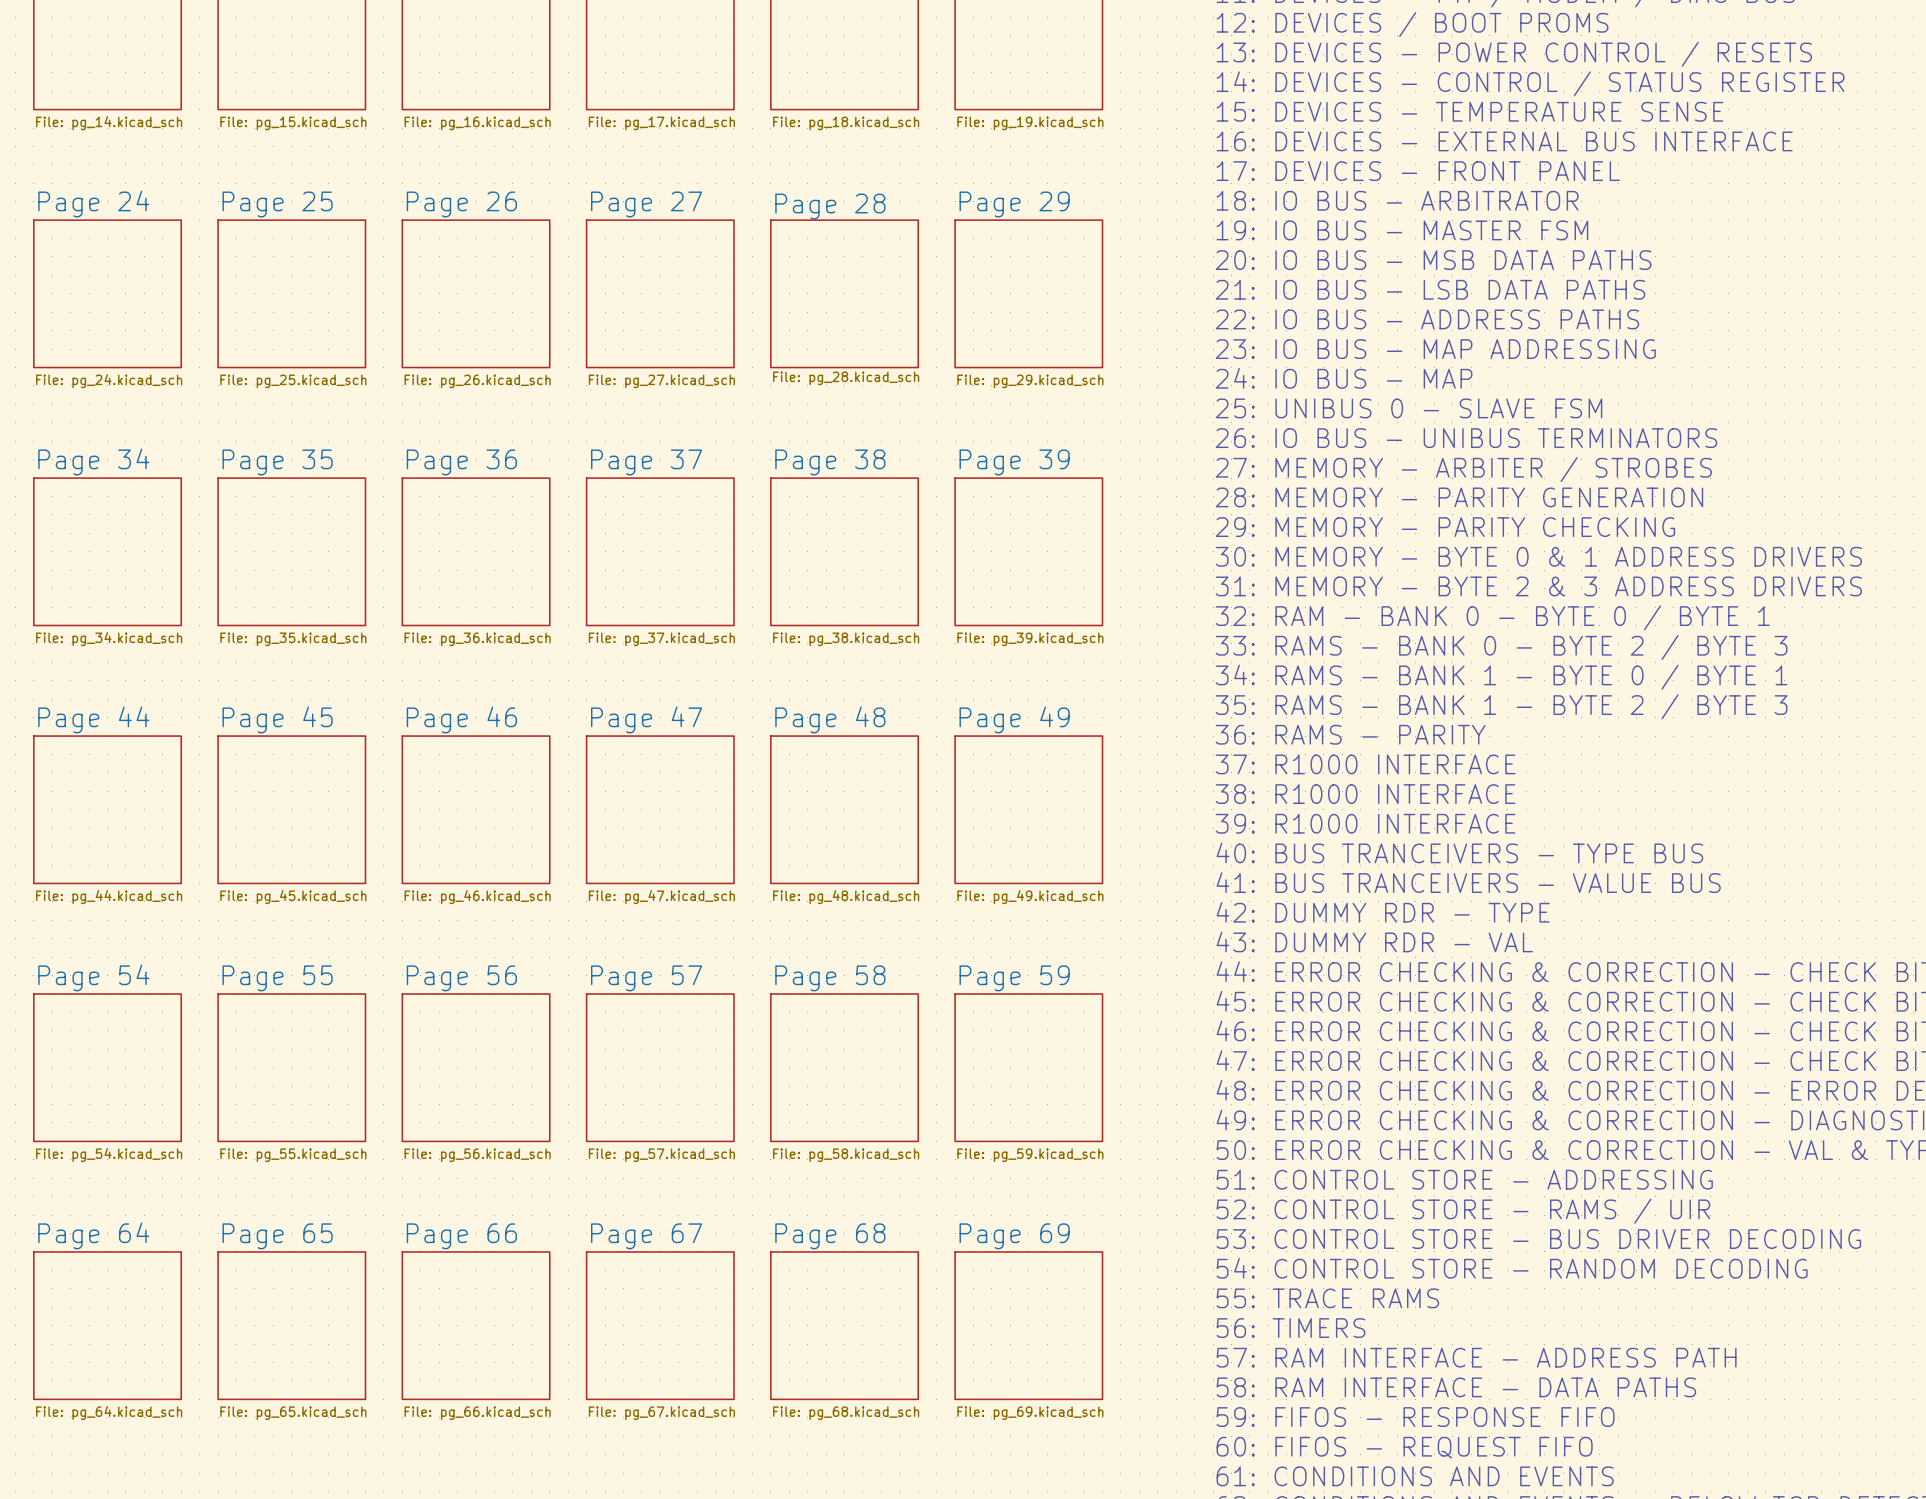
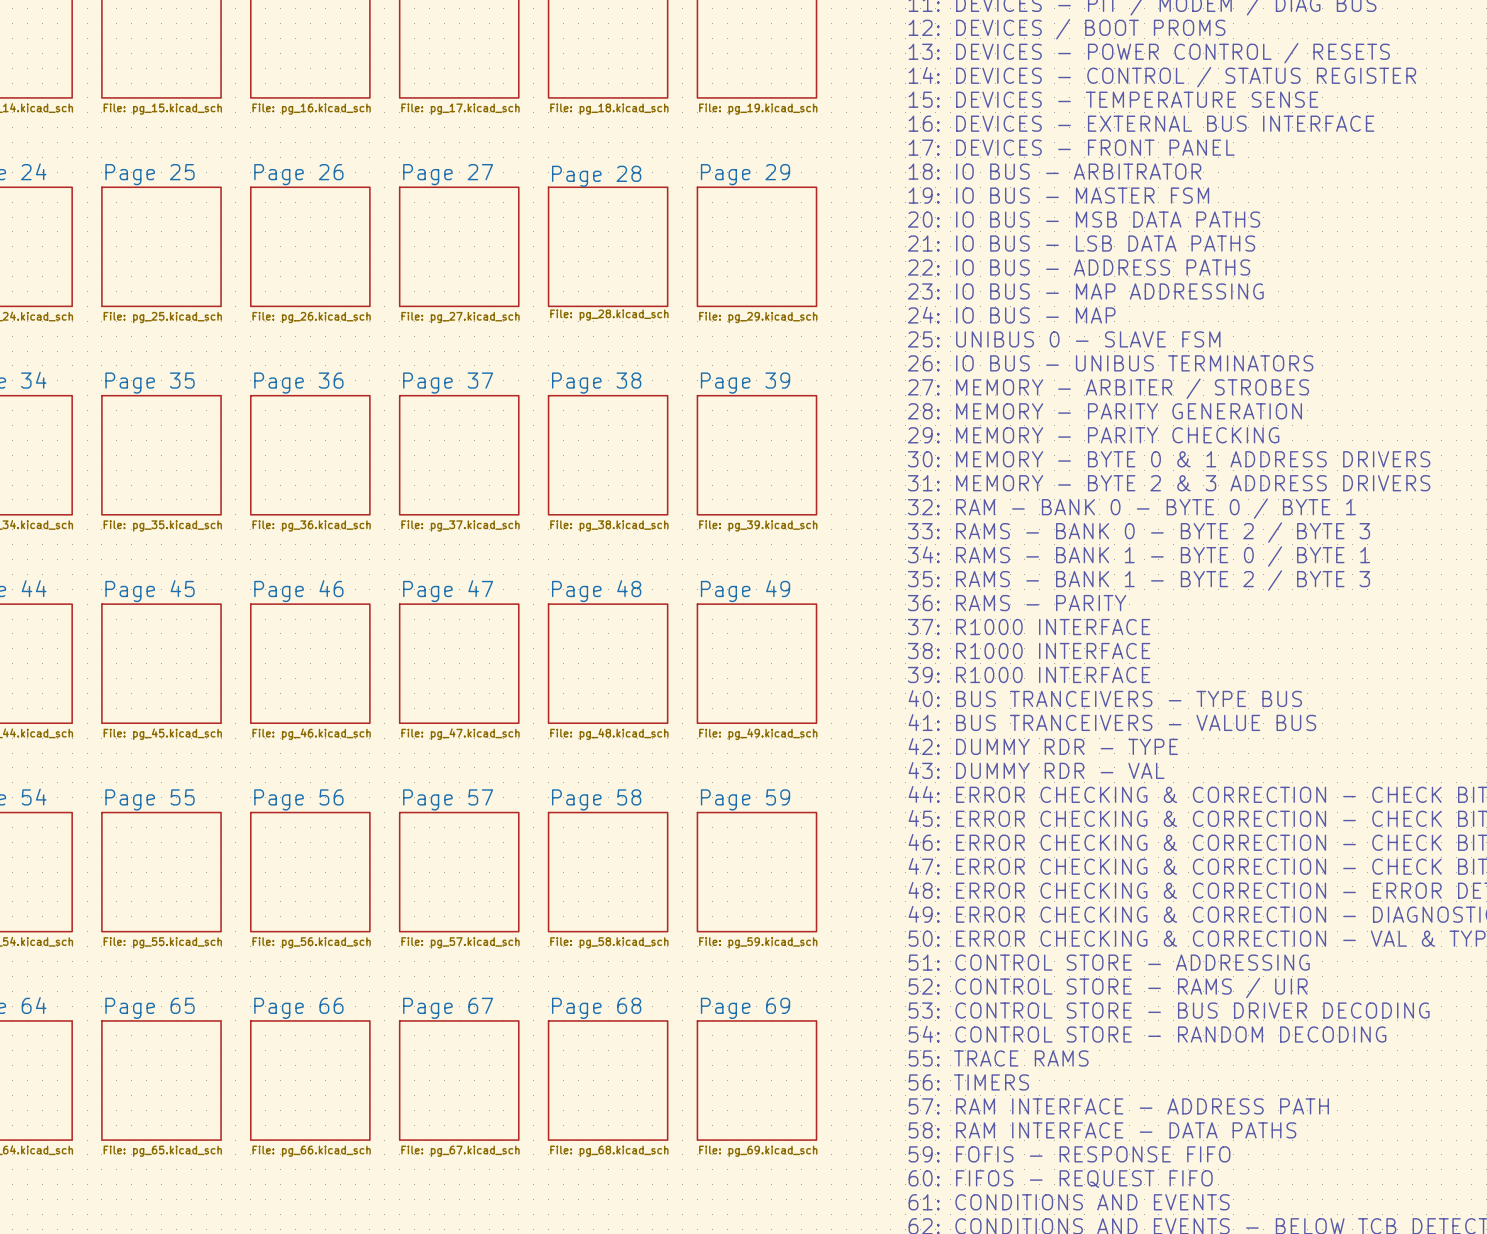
text: 59: FIFOS - RESPONSE FIFO (1415, 1417) -> 59: FOFIS - RESPONSE FIFO (1069, 1154)

